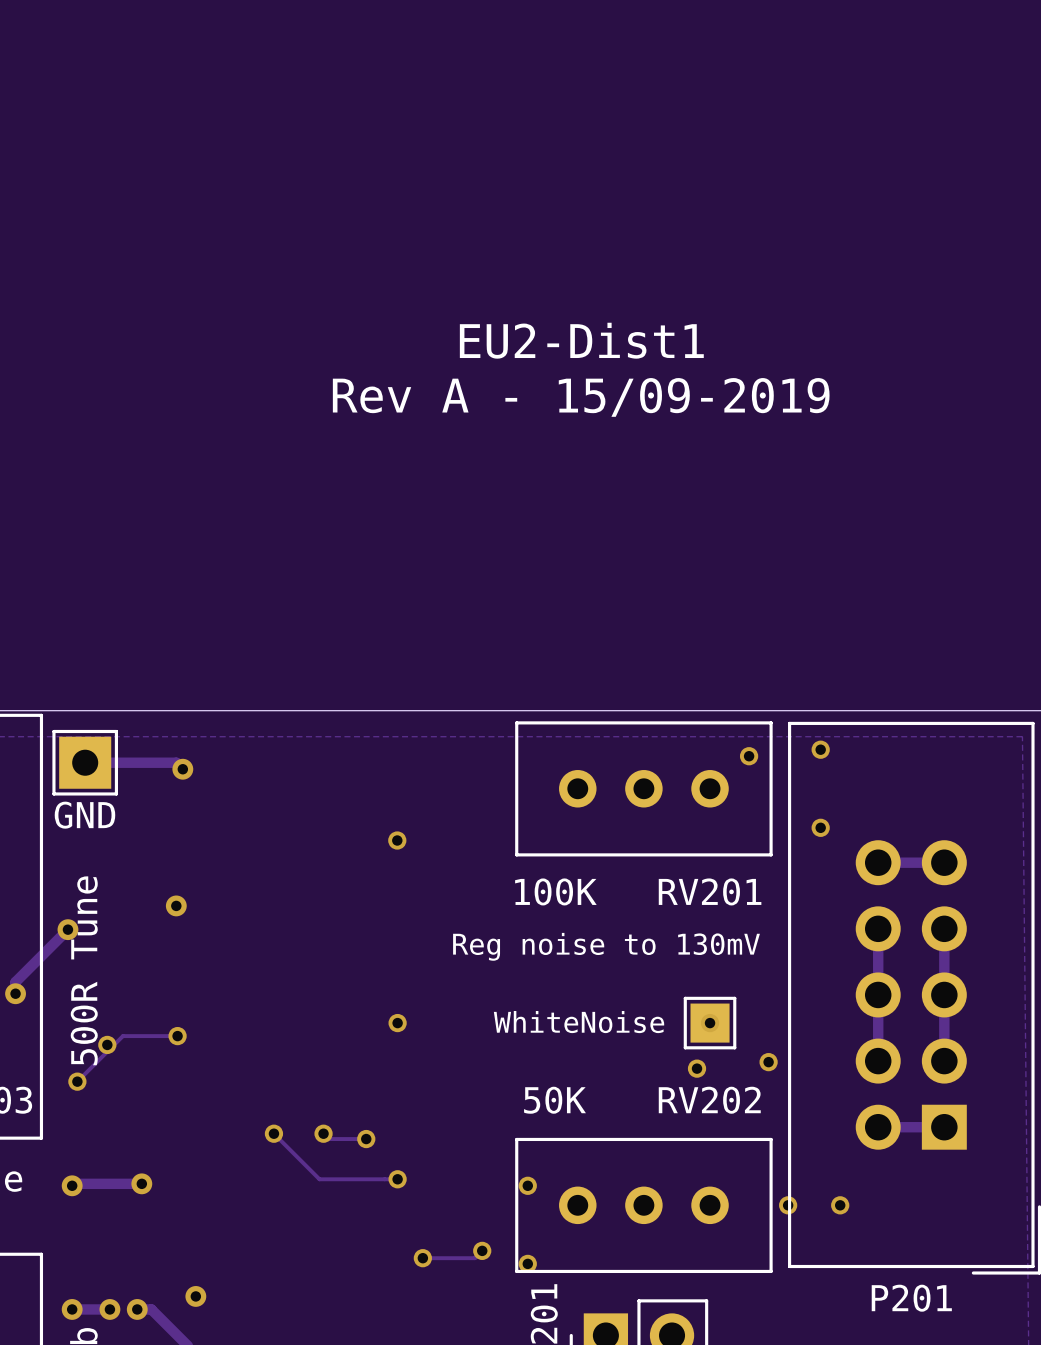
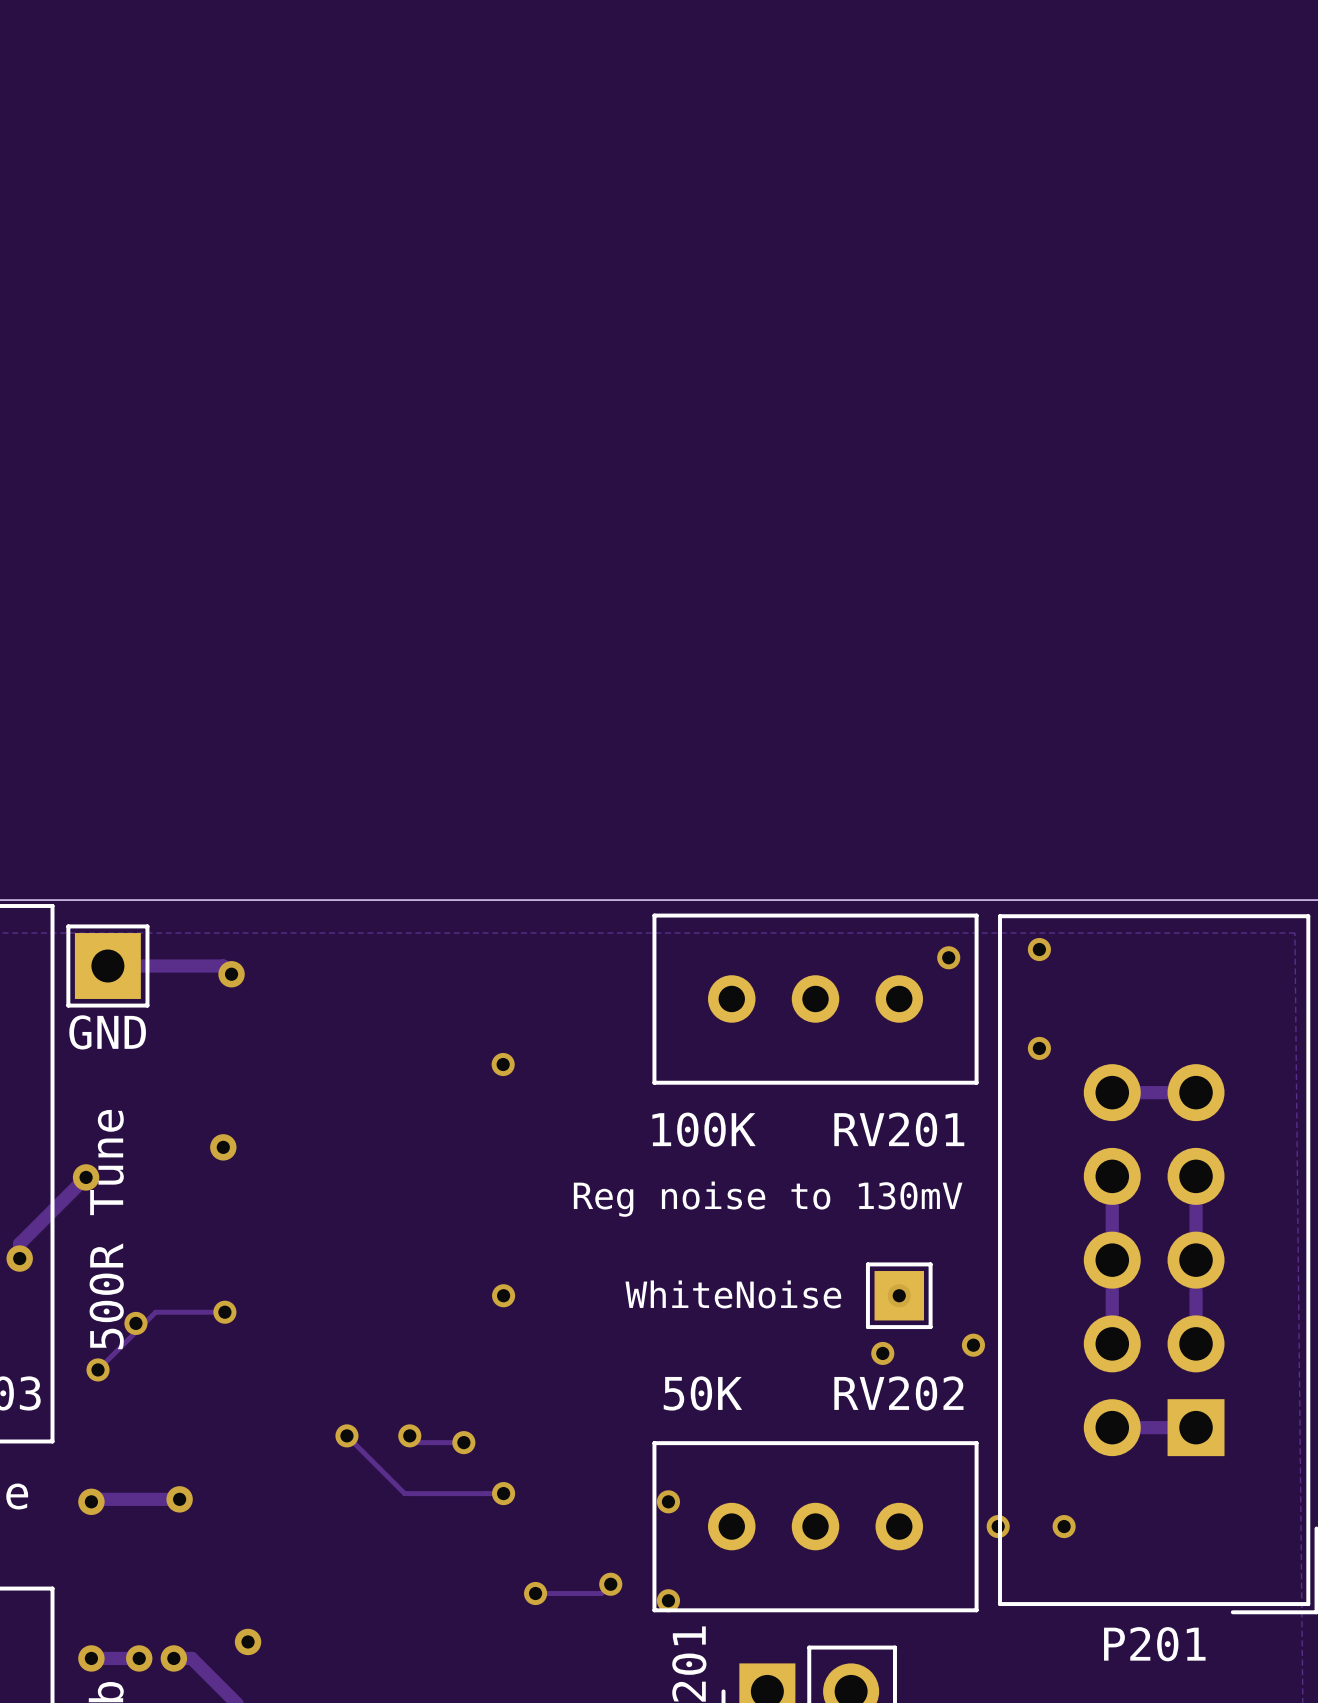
text: EU2-Dist1 (581, 340) -> none
text: Rev A - 15/09-2019 (581, 397) -> none

